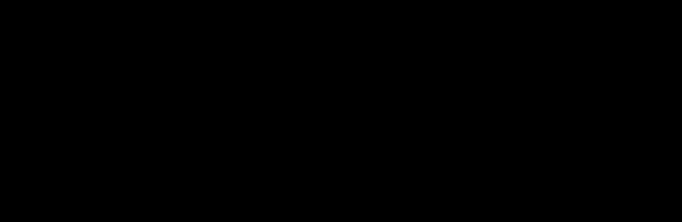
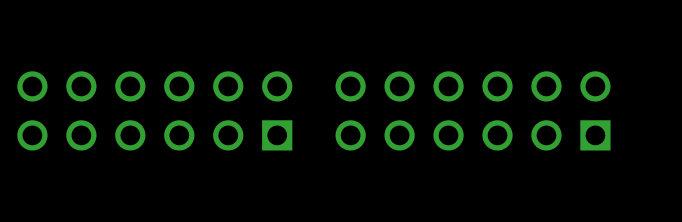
part: none -> (154, 110)
part: none -> (473, 110)

